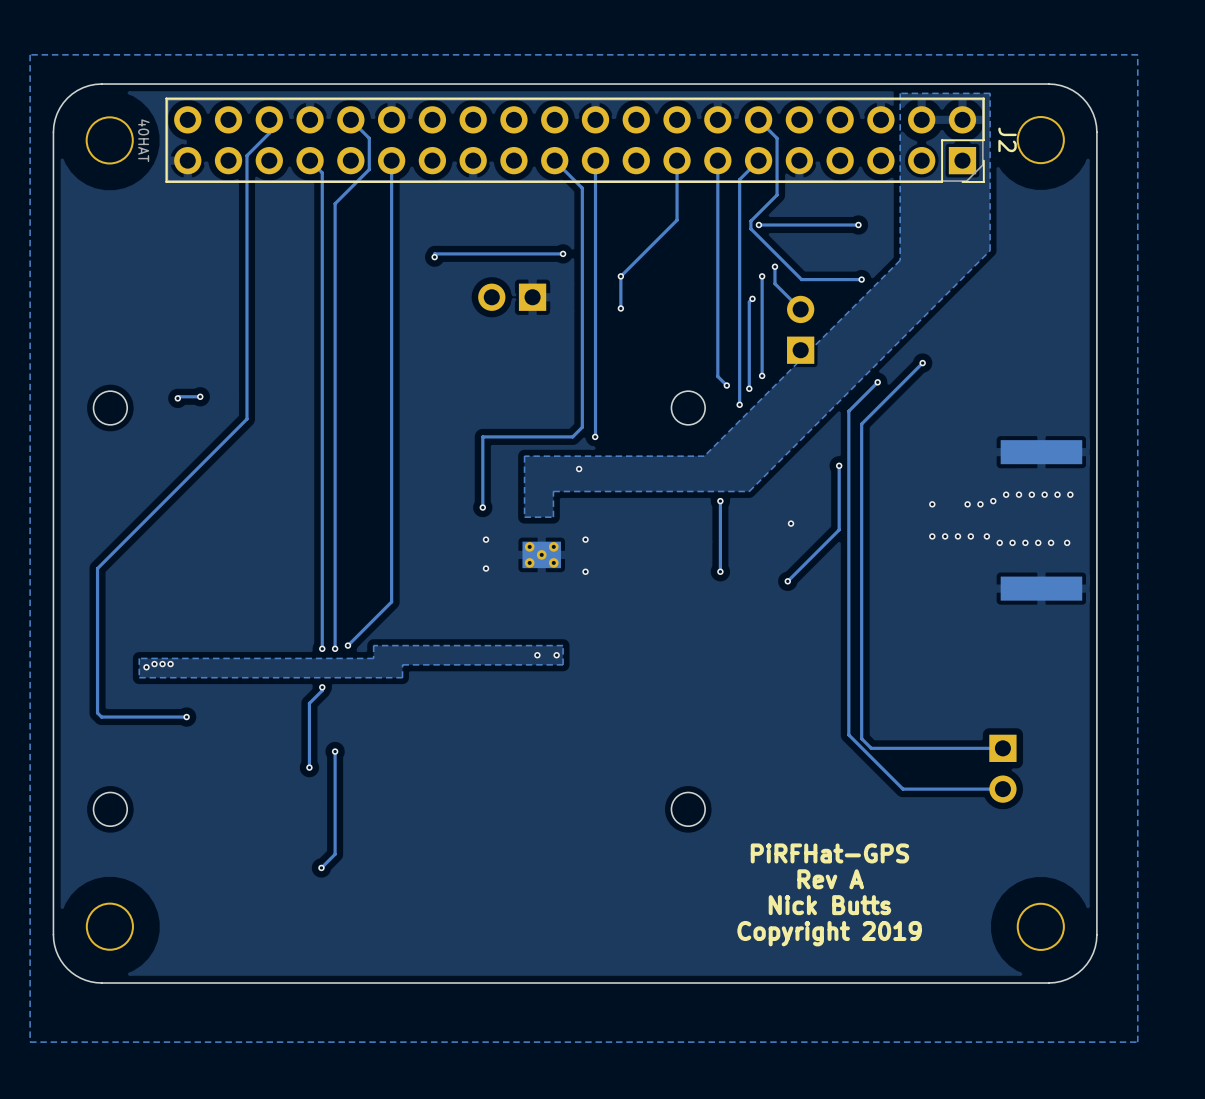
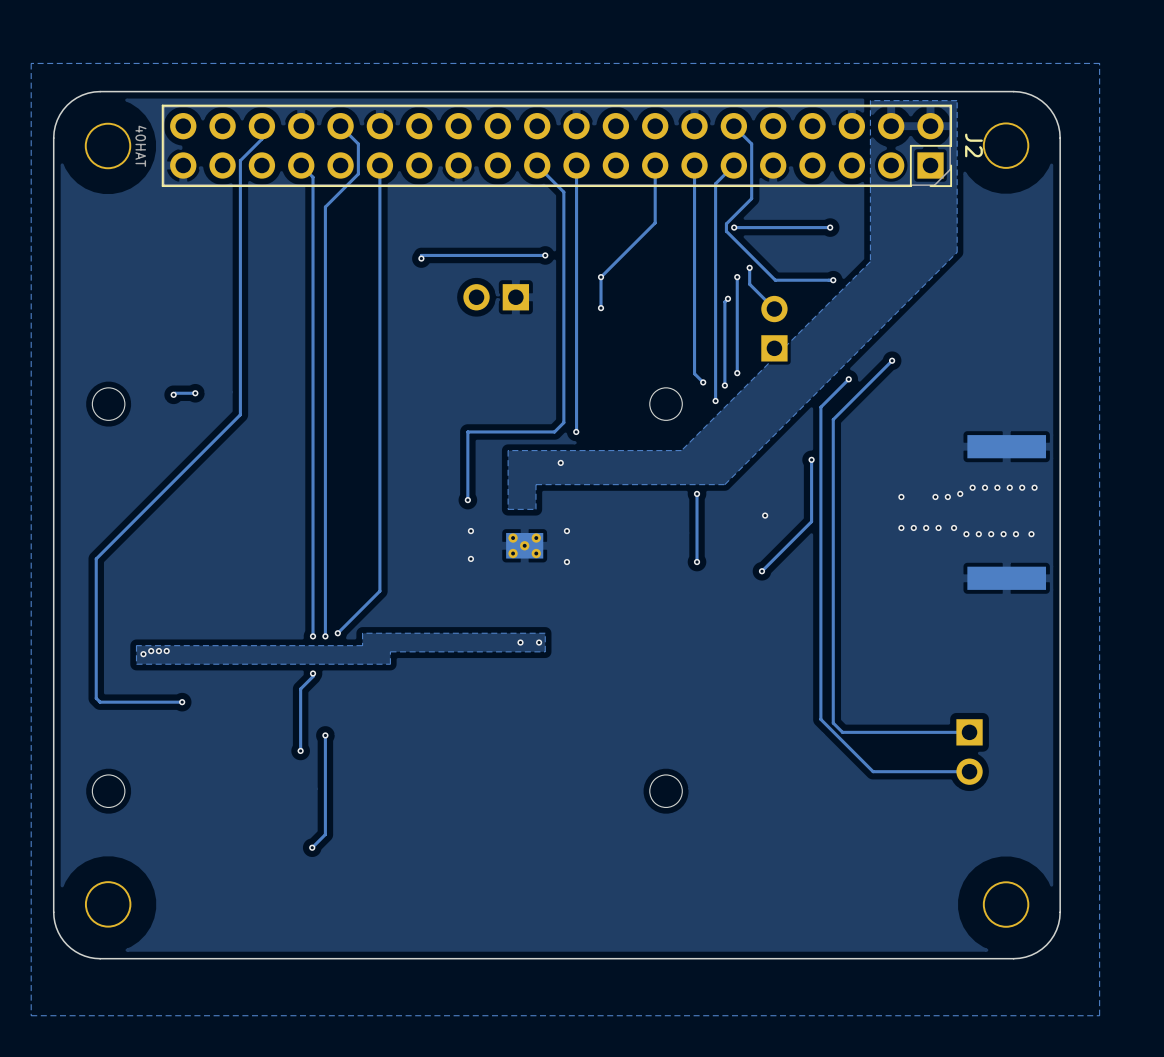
text: PiRFHat-GPS (829, 853) -> none
text: Rev A (830, 879) -> none
text: Nick Butts (829, 905) -> none
text: Copyright 2019 (829, 933) -> none

